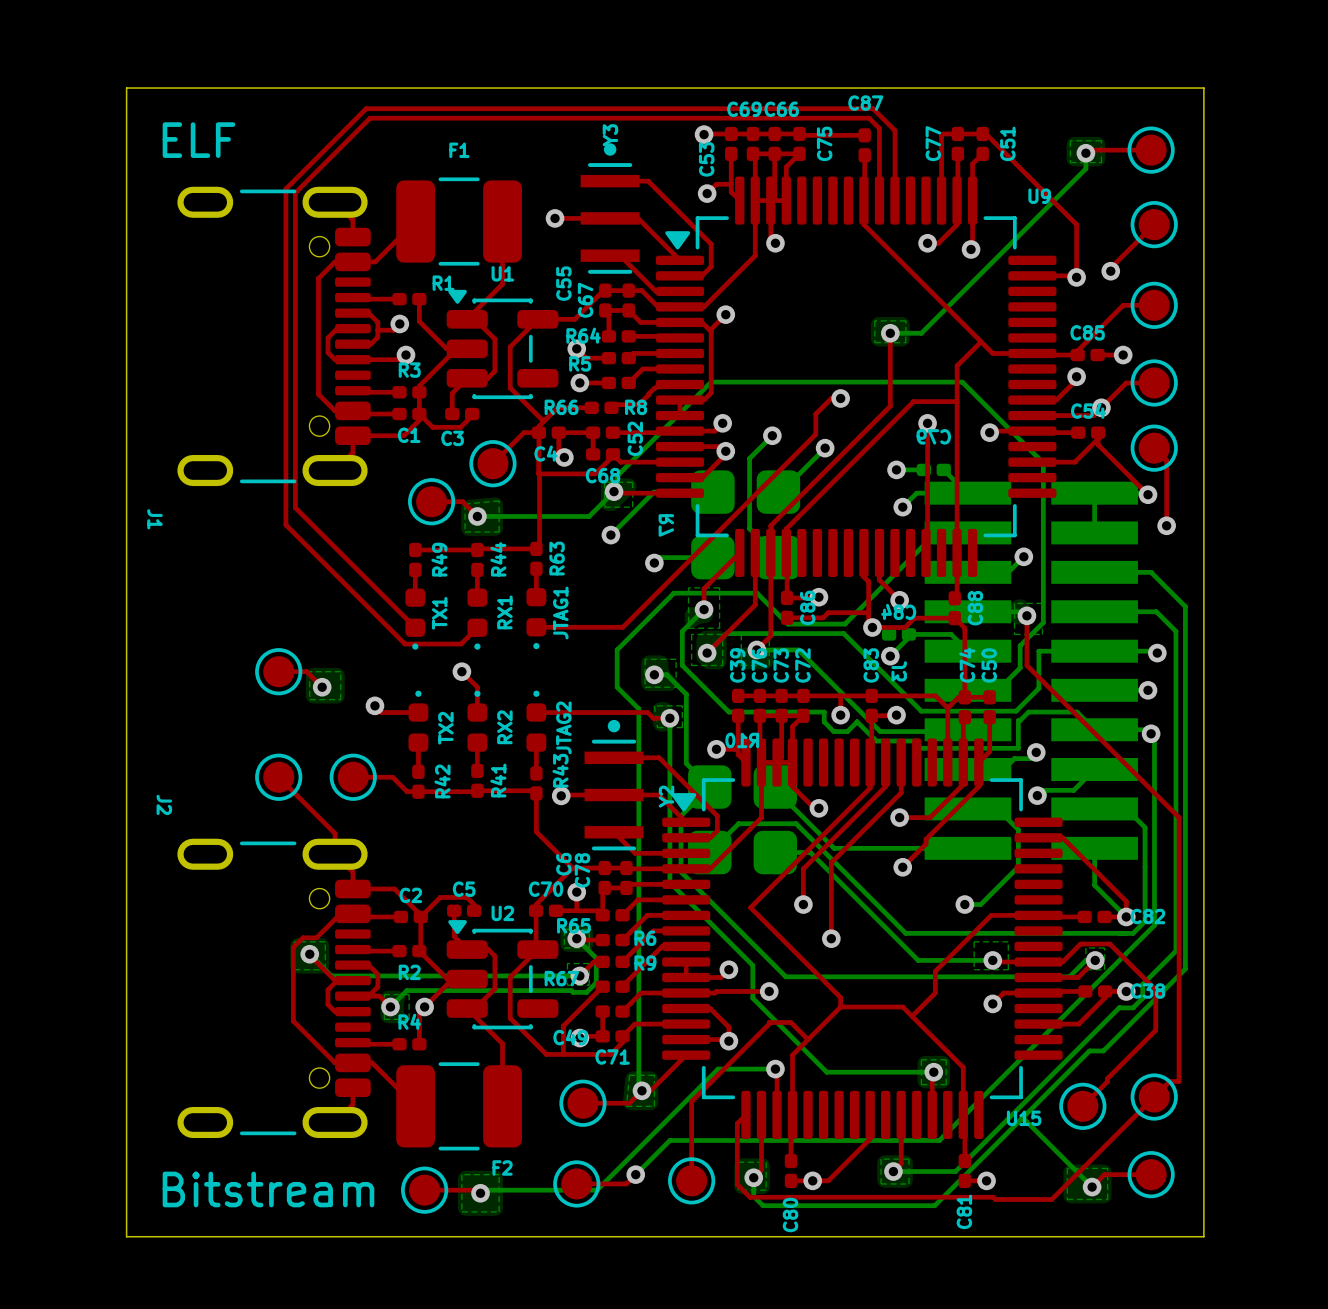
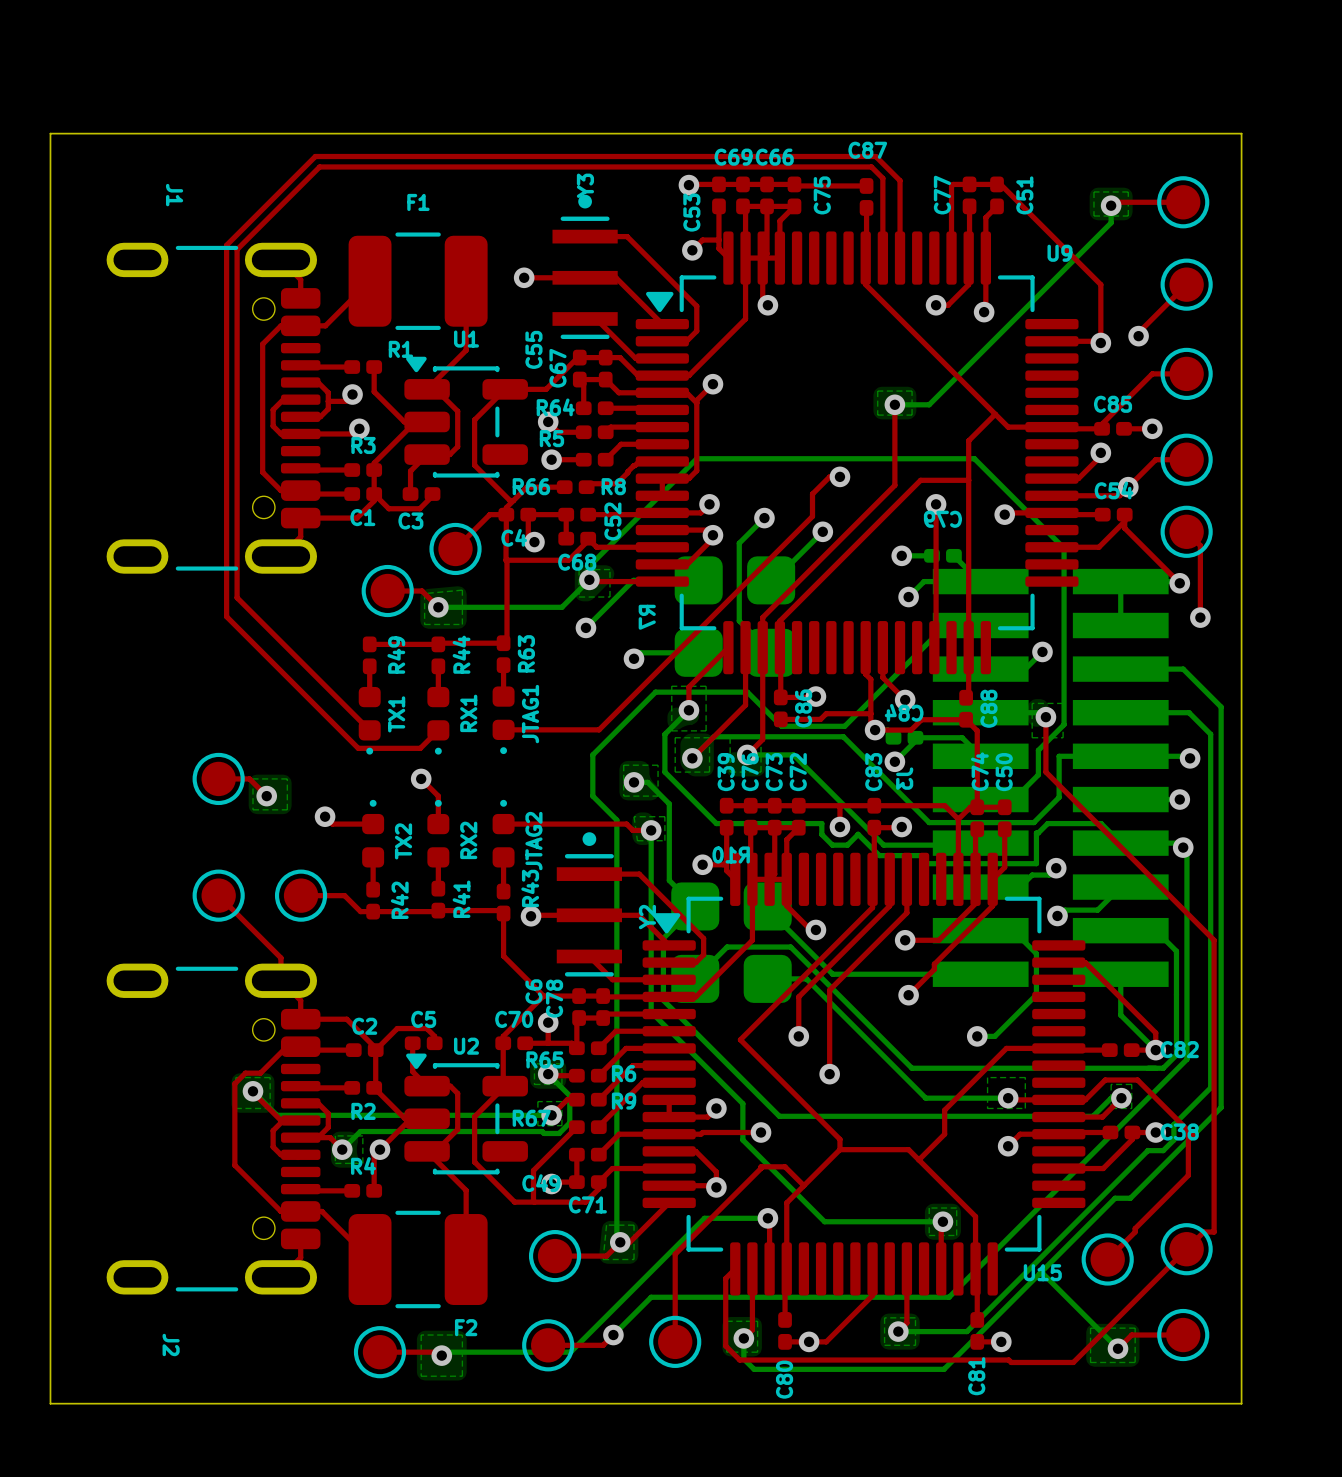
text: ELF (198, 140) -> none
J1 name position: J1 (155, 519) -> J1 (174, 195)
J2 name position: J2 (164, 804) -> J2 (171, 1344)
text: Bitstream (268, 1189) -> none

